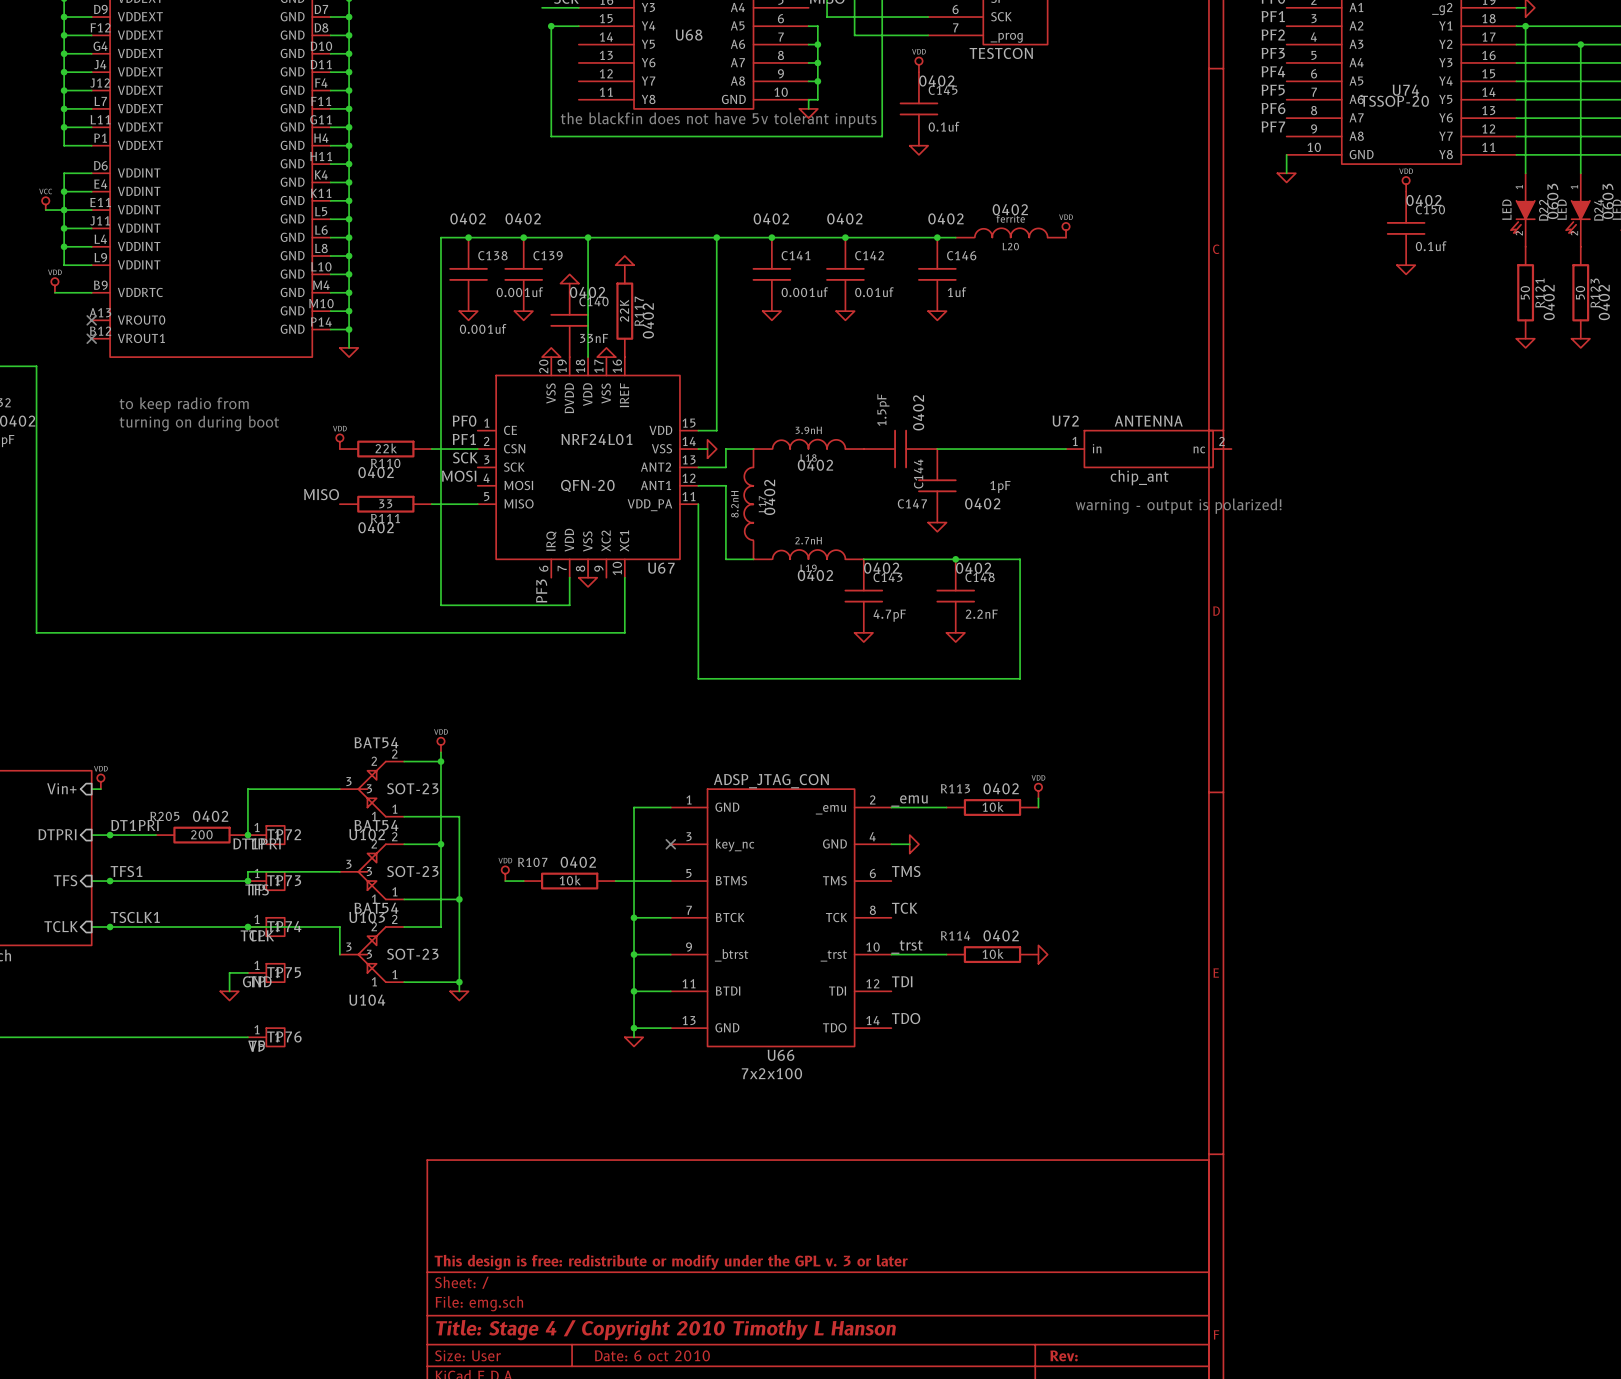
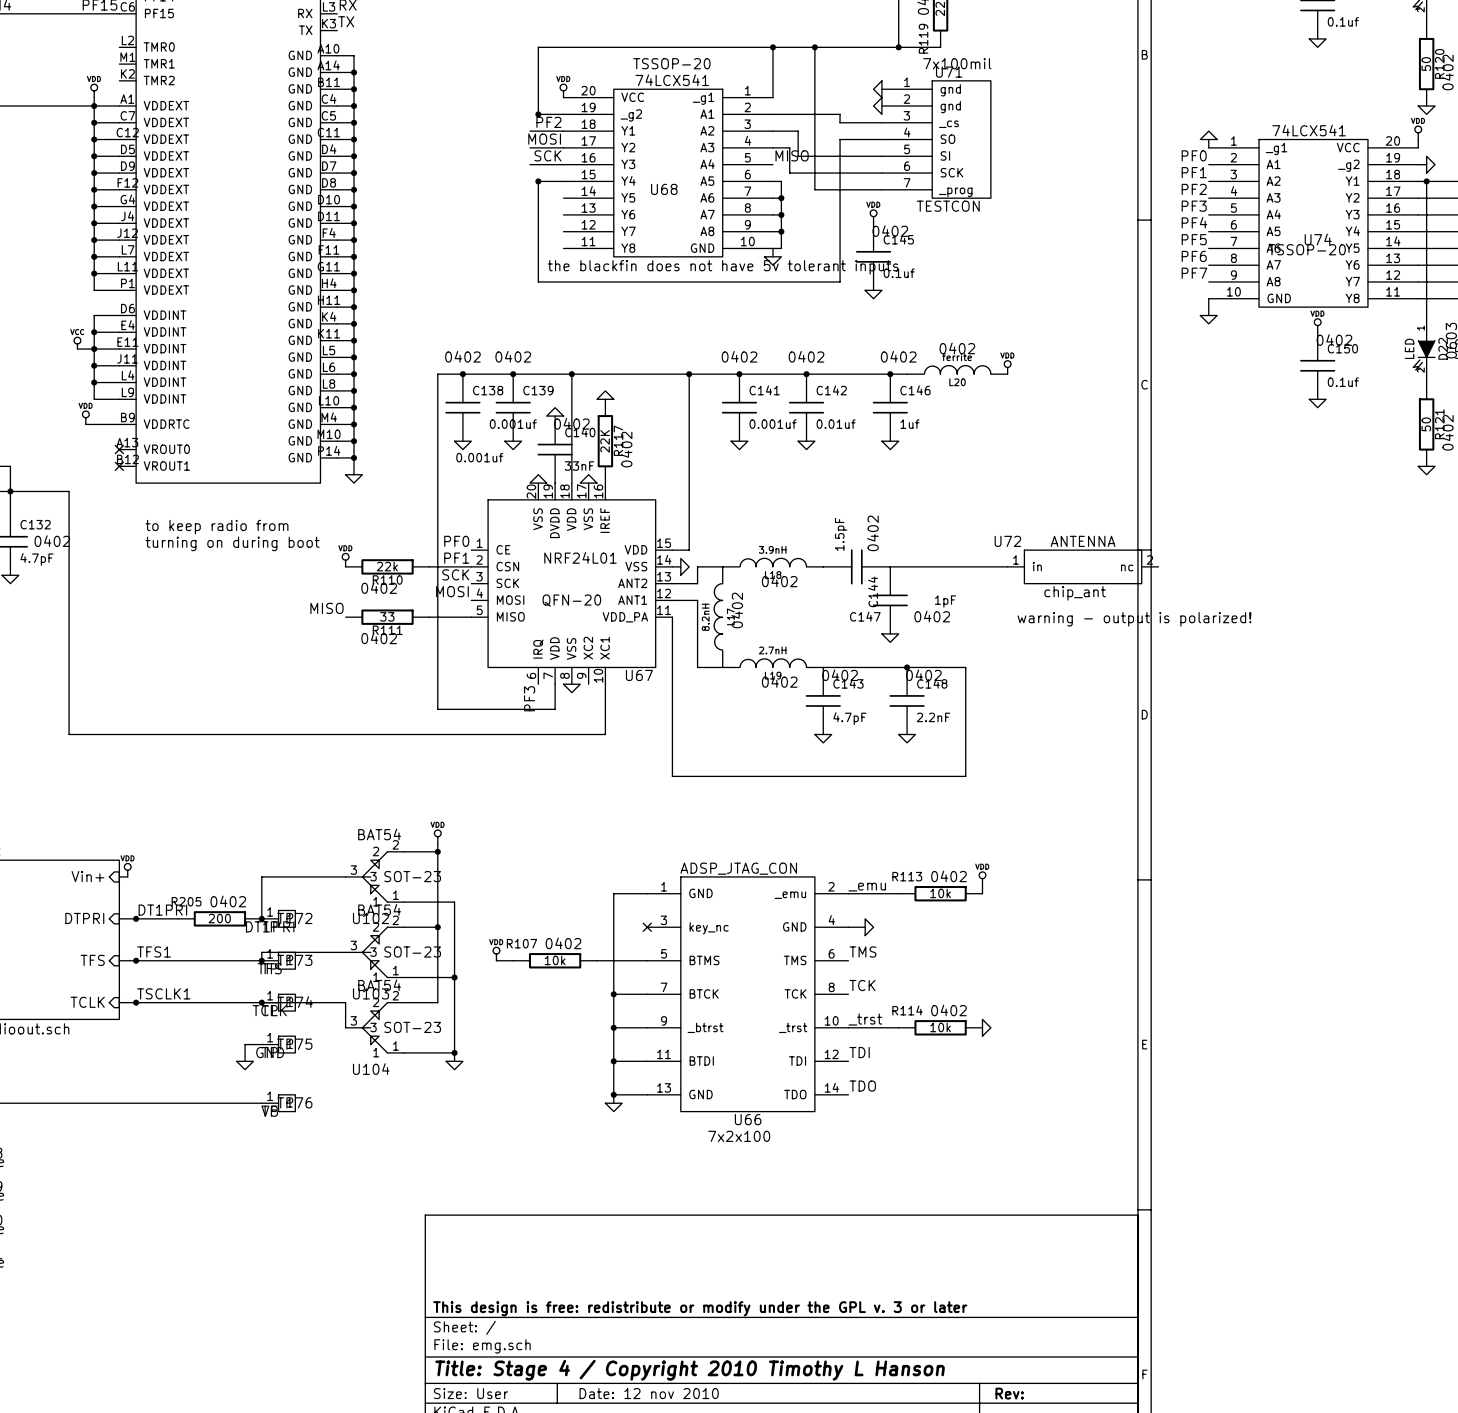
title block: Date: 6 oct 2010 (652, 1355) -> Date: 12 nov 2010 (649, 1393)

